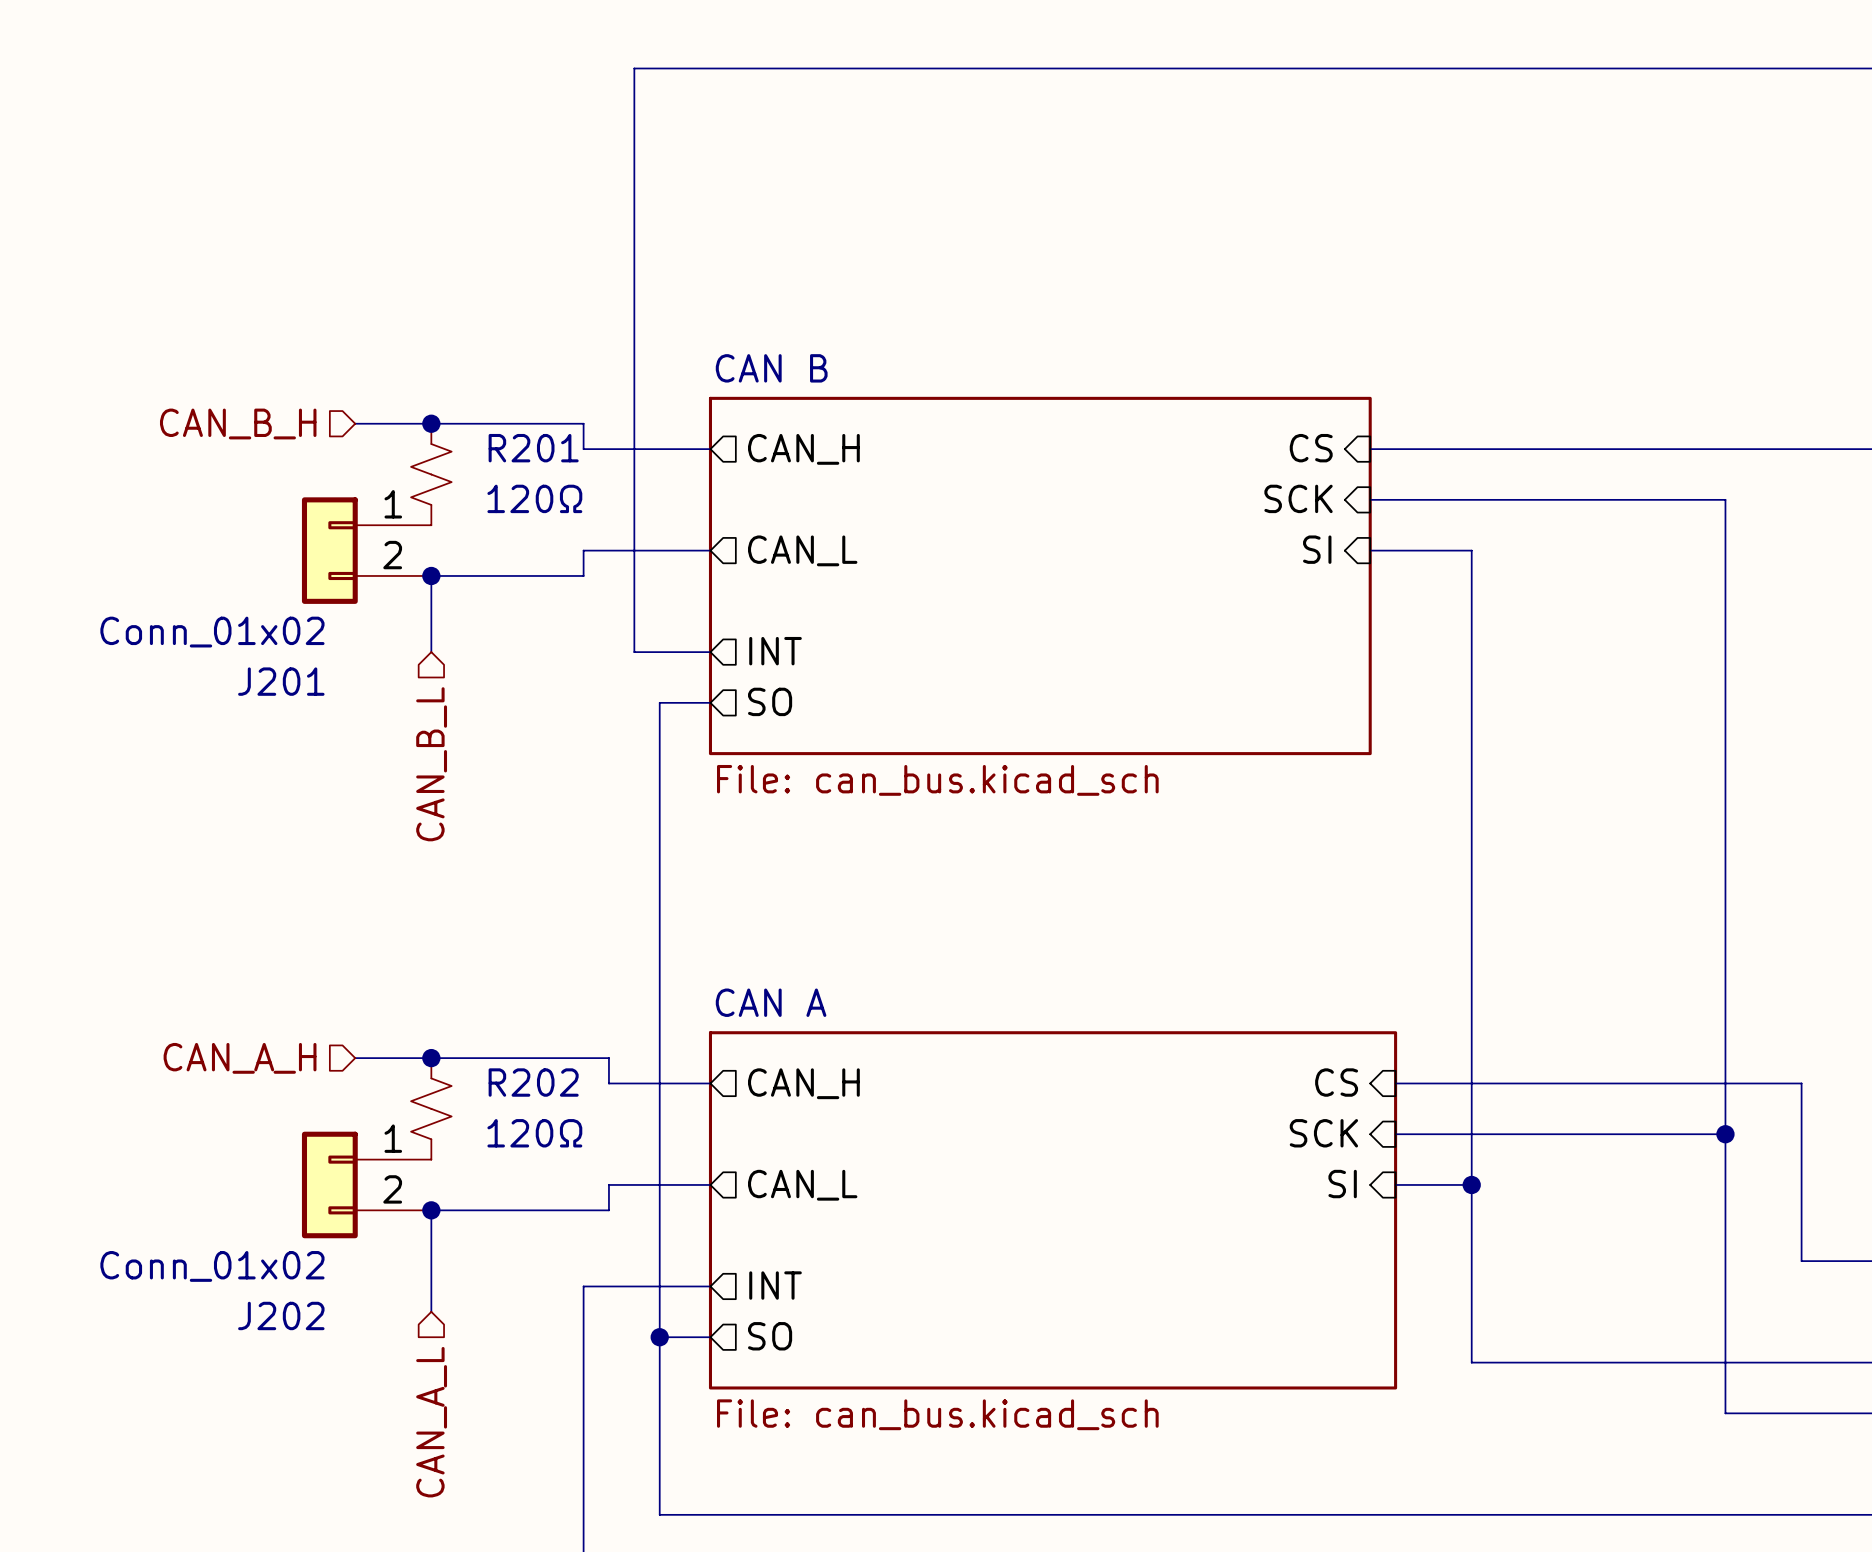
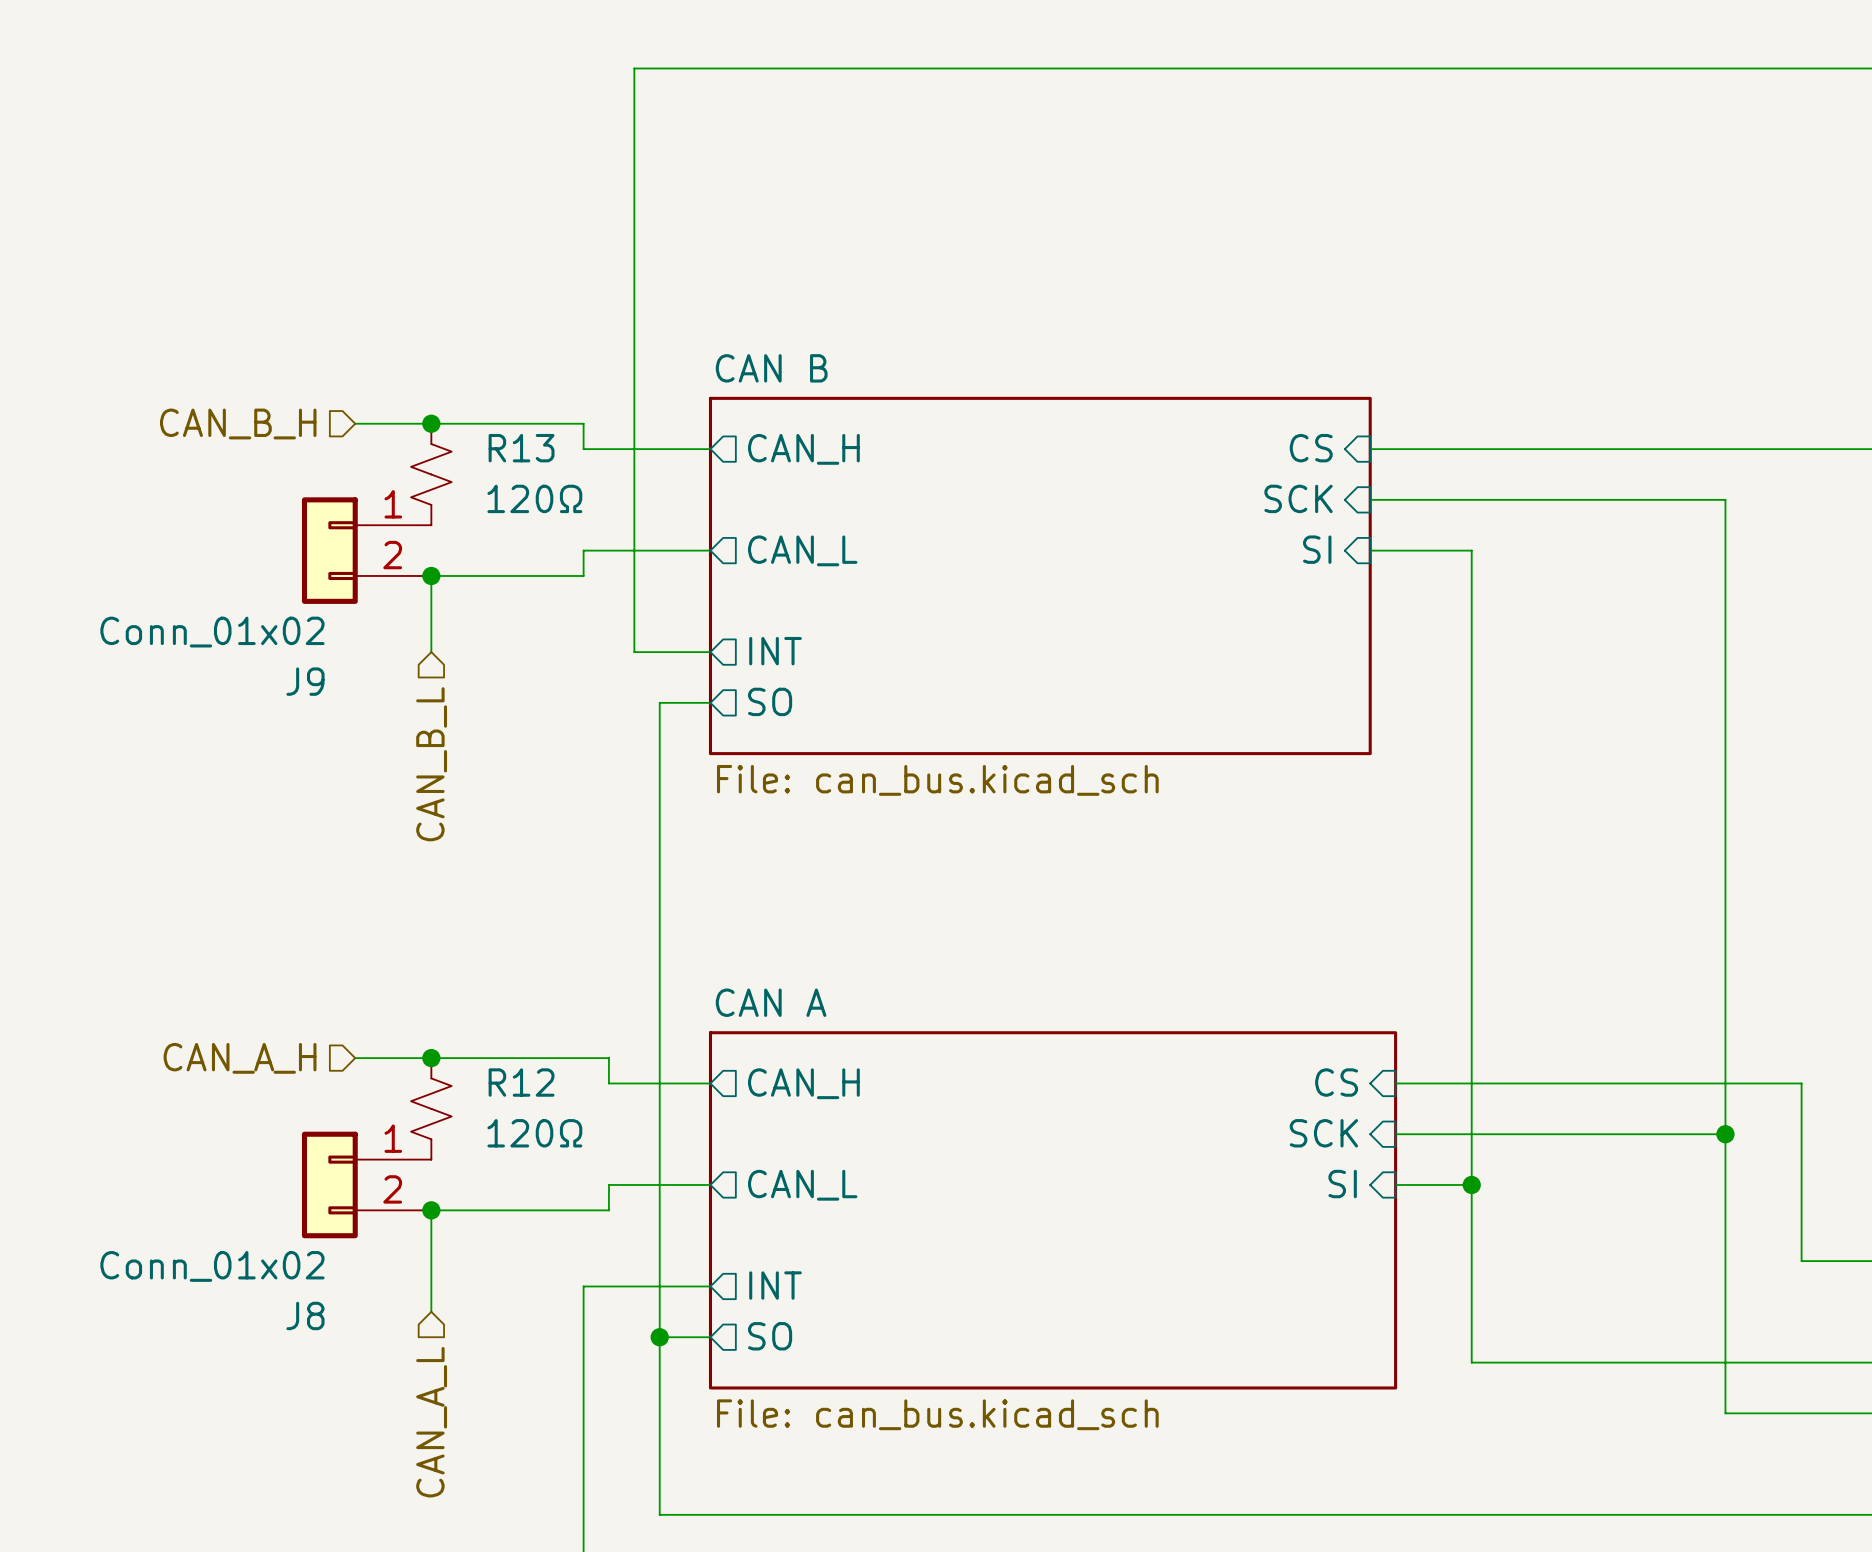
R201 name: R201 (533, 448) -> R13 (521, 448)
J201 name: J201 (281, 681) -> J9 (305, 681)
R202 name: R202 (533, 1082) -> R12 (521, 1082)
J202 name: J202 (281, 1315) -> J8 (305, 1315)

